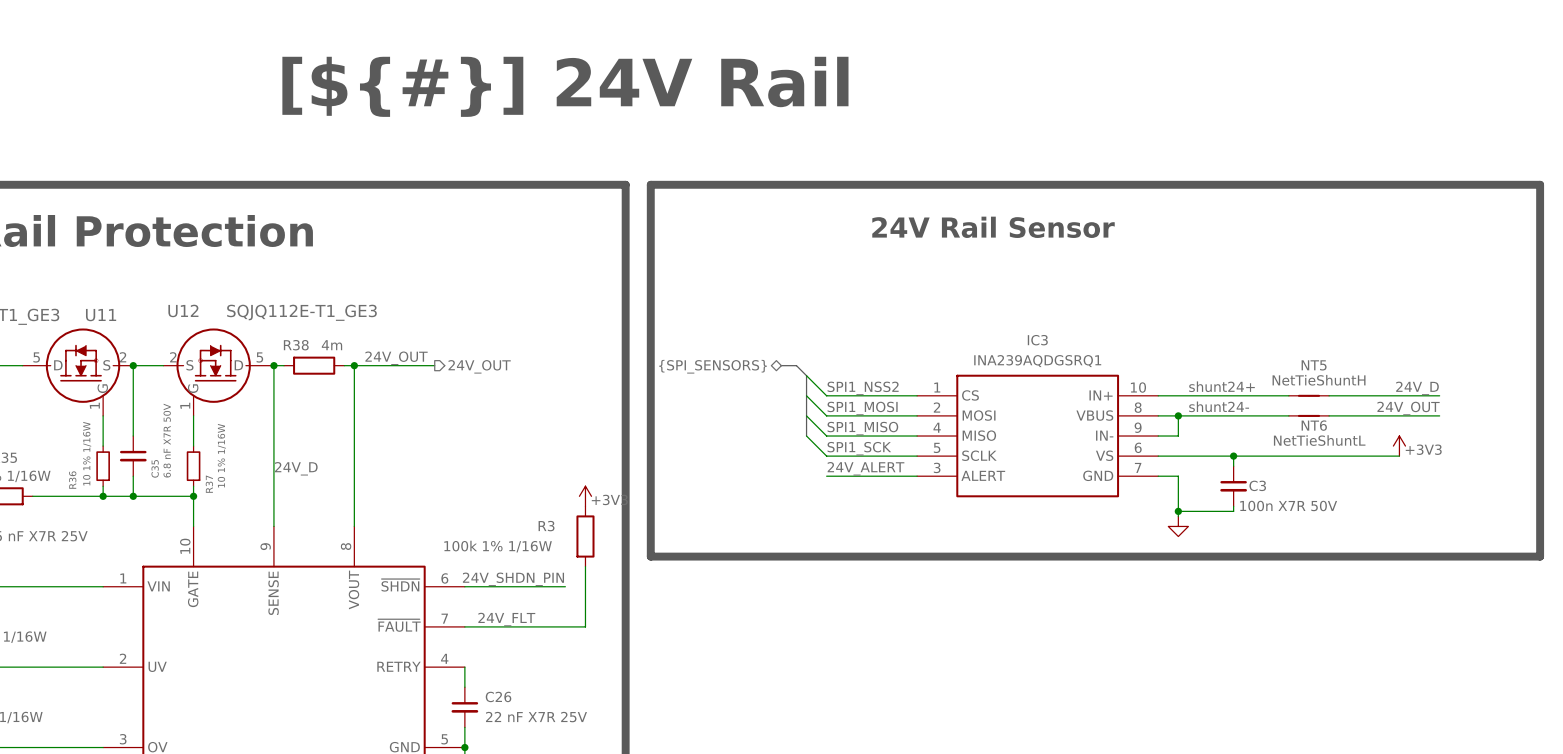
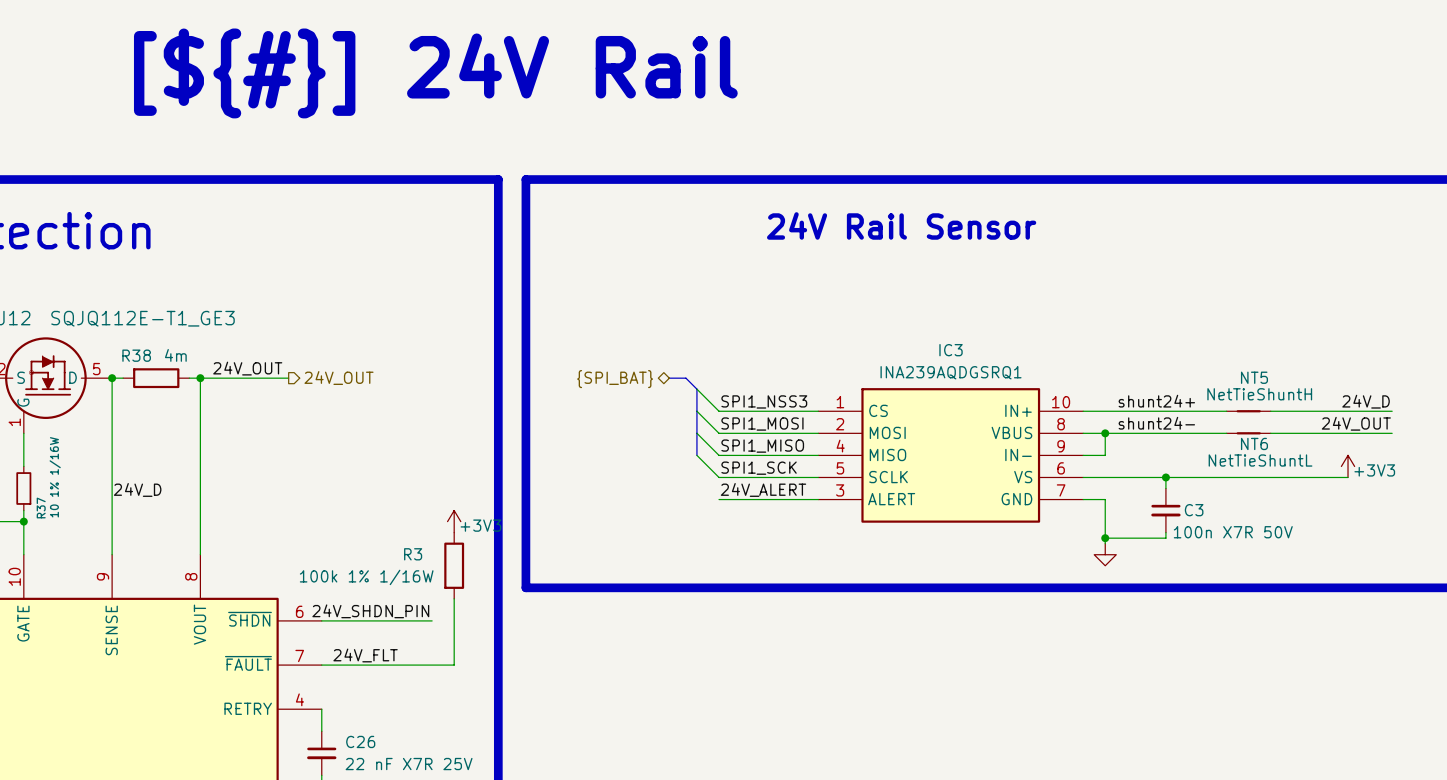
hierarchical label: {SPI_SENSORS} (713, 366) -> {SPI_BAT} (615, 379)
label: SPI1_NSS2 (863, 388) -> SPI1_NSS3 (764, 401)

